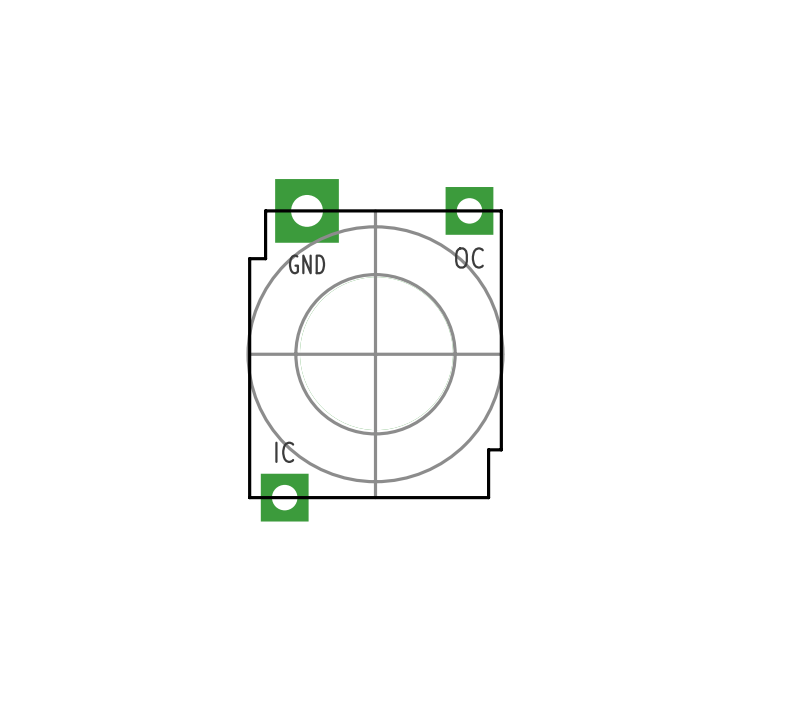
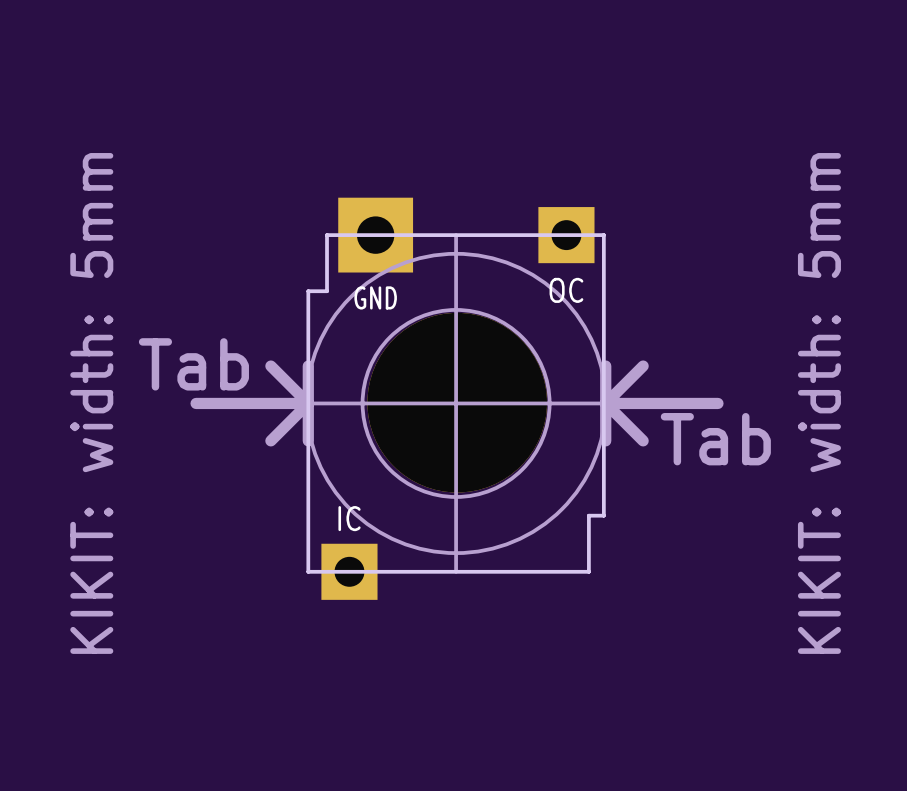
drawing: none -> [190, 360, 314, 447]
drawing: none -> [600, 360, 724, 447]

